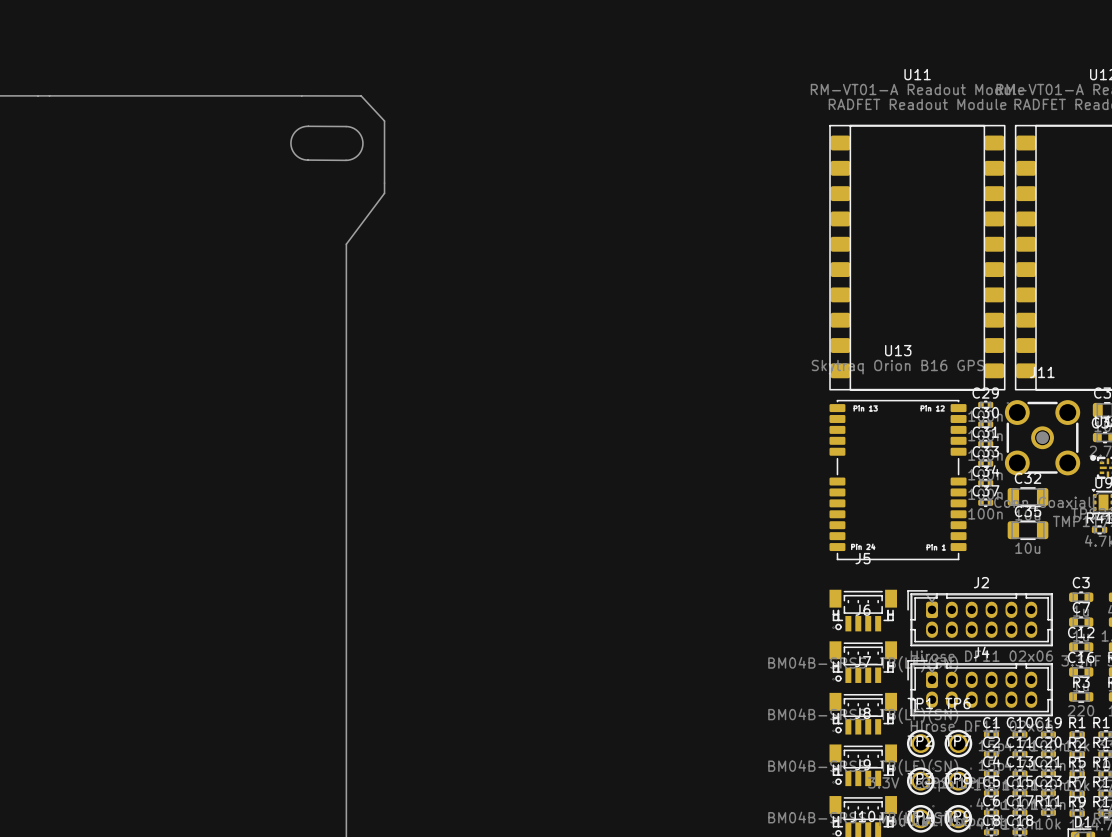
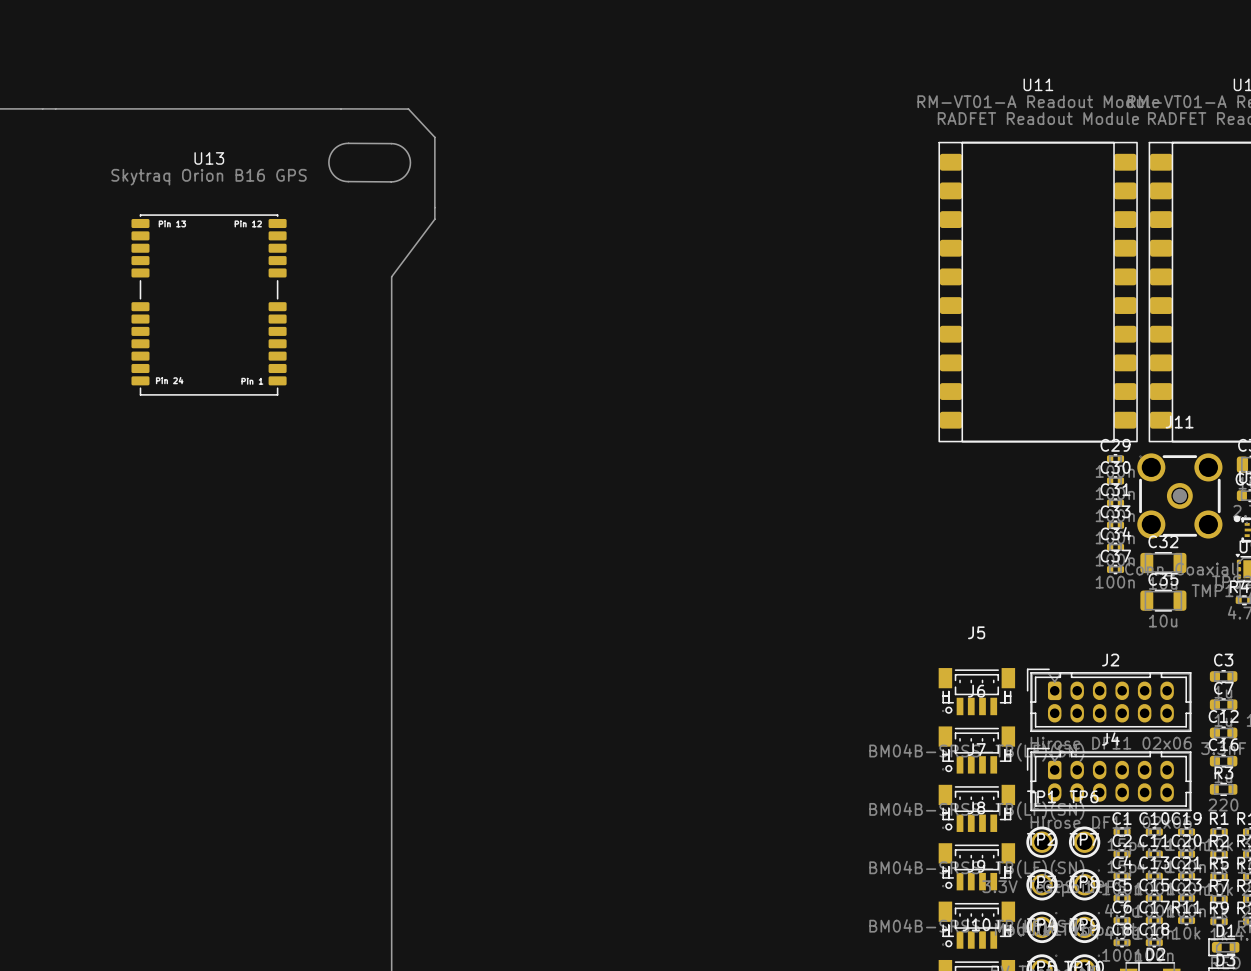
U13 position: (898, 480) -> (209, 304)

